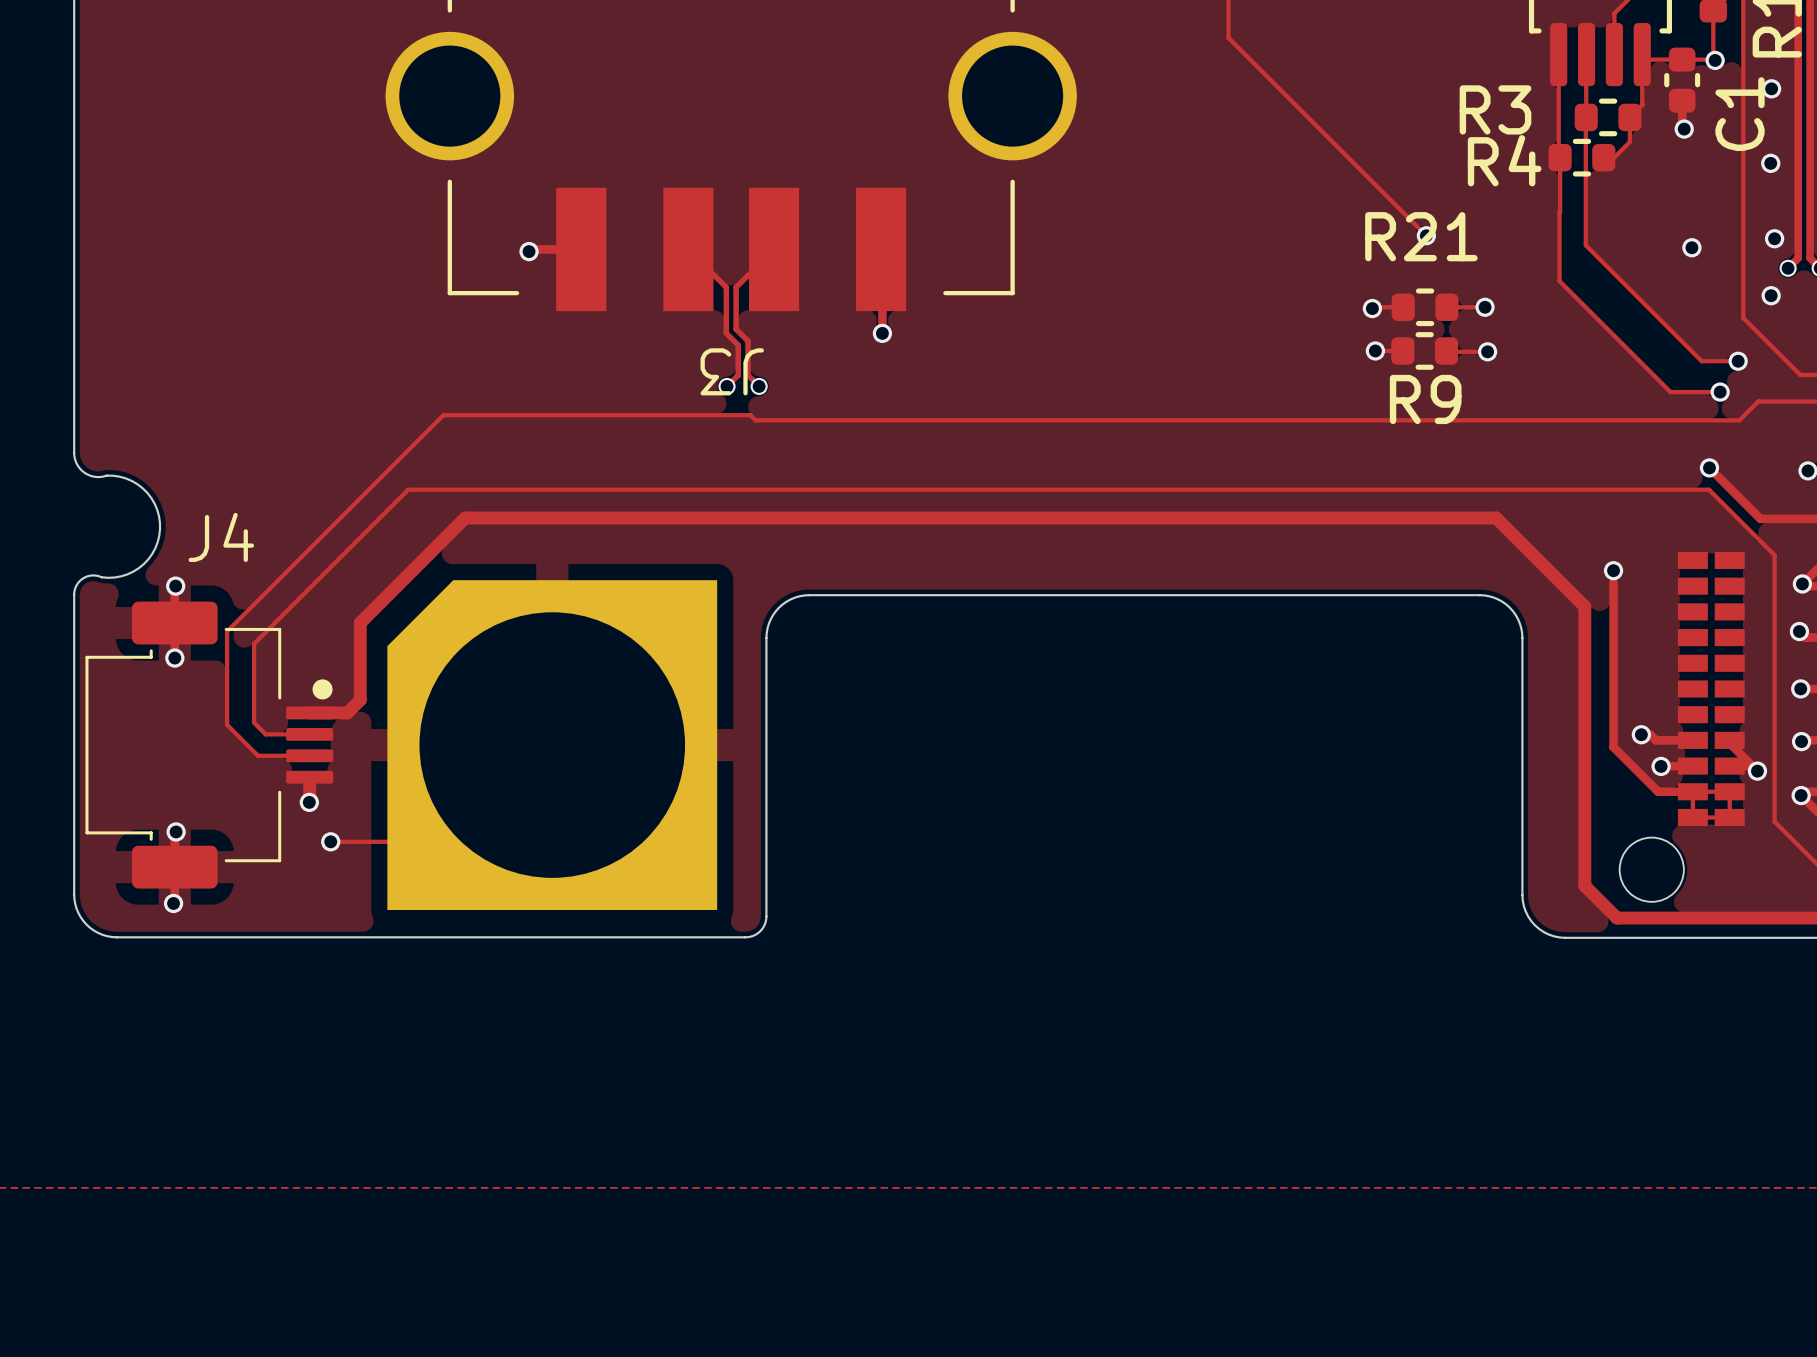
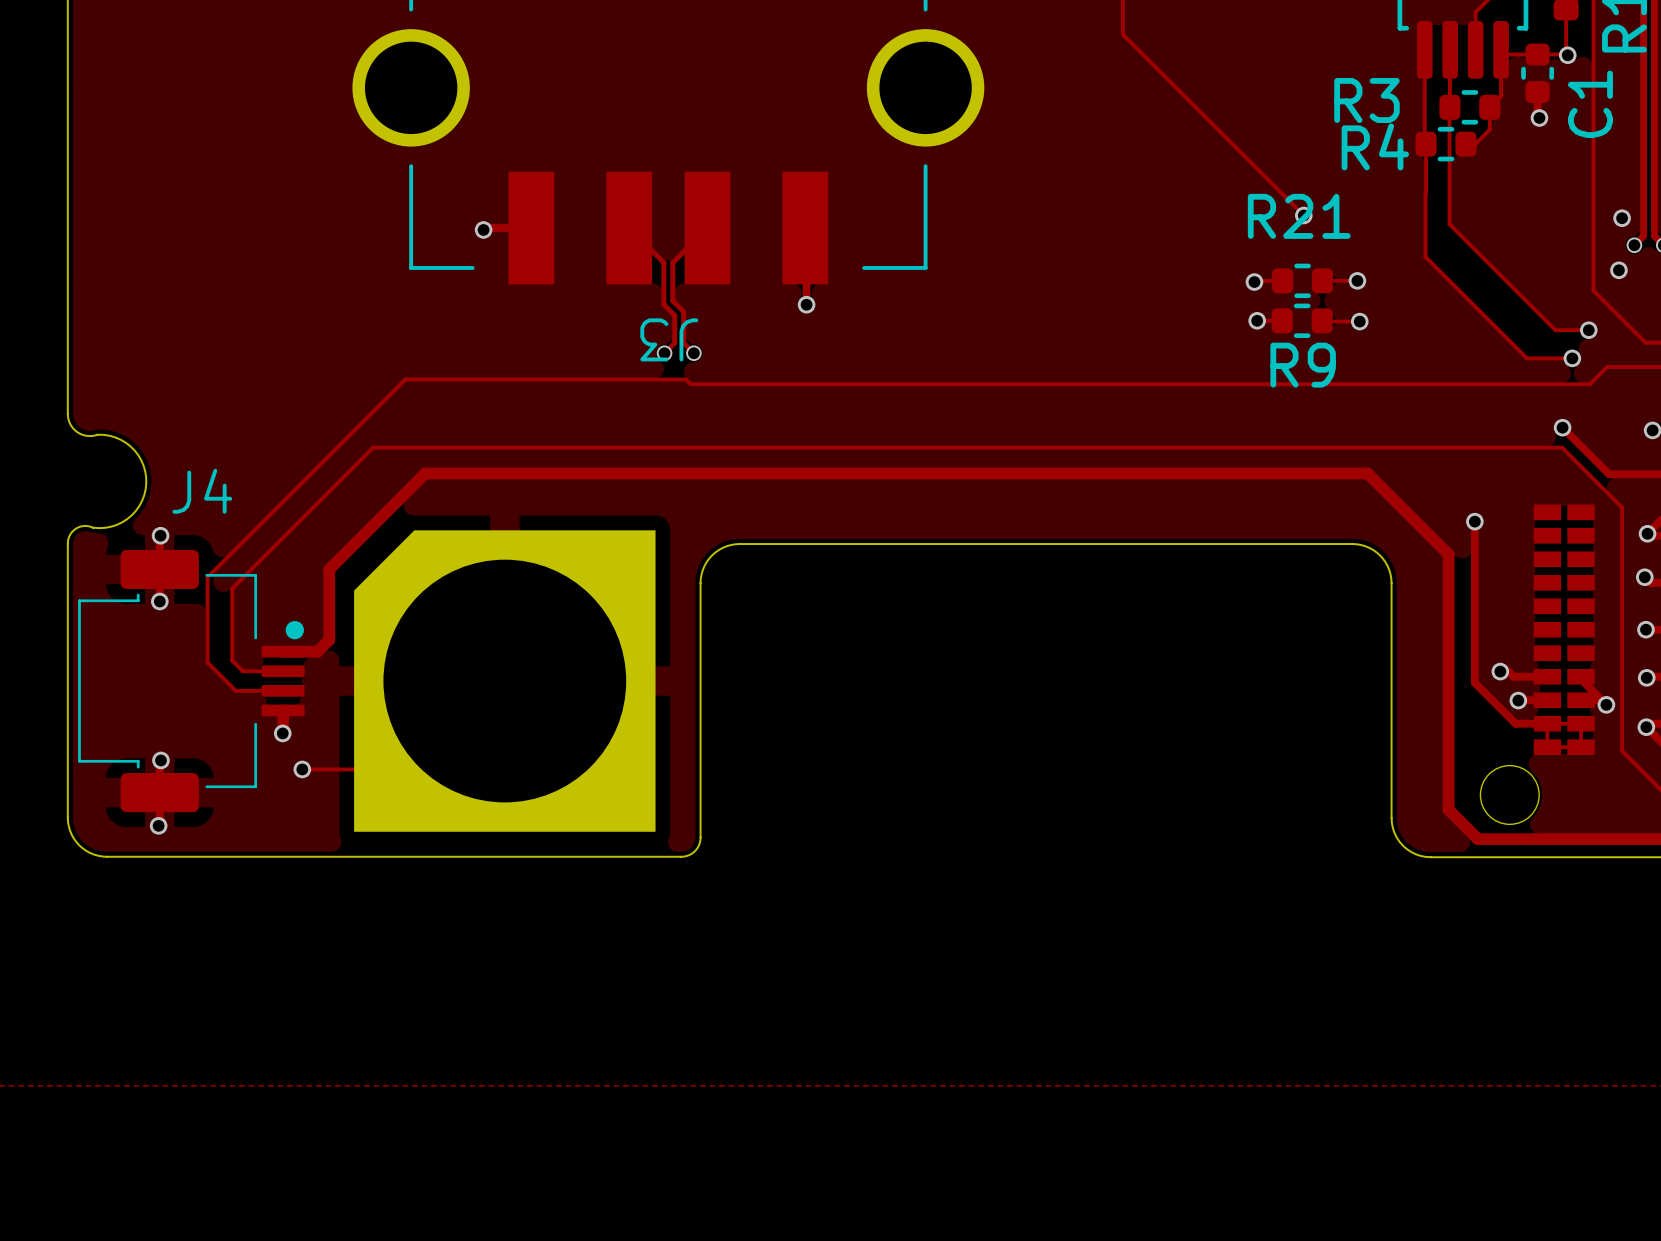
via: (1771, 88) -> none
via: (1770, 163) -> none
via: (1691, 247) -> none

